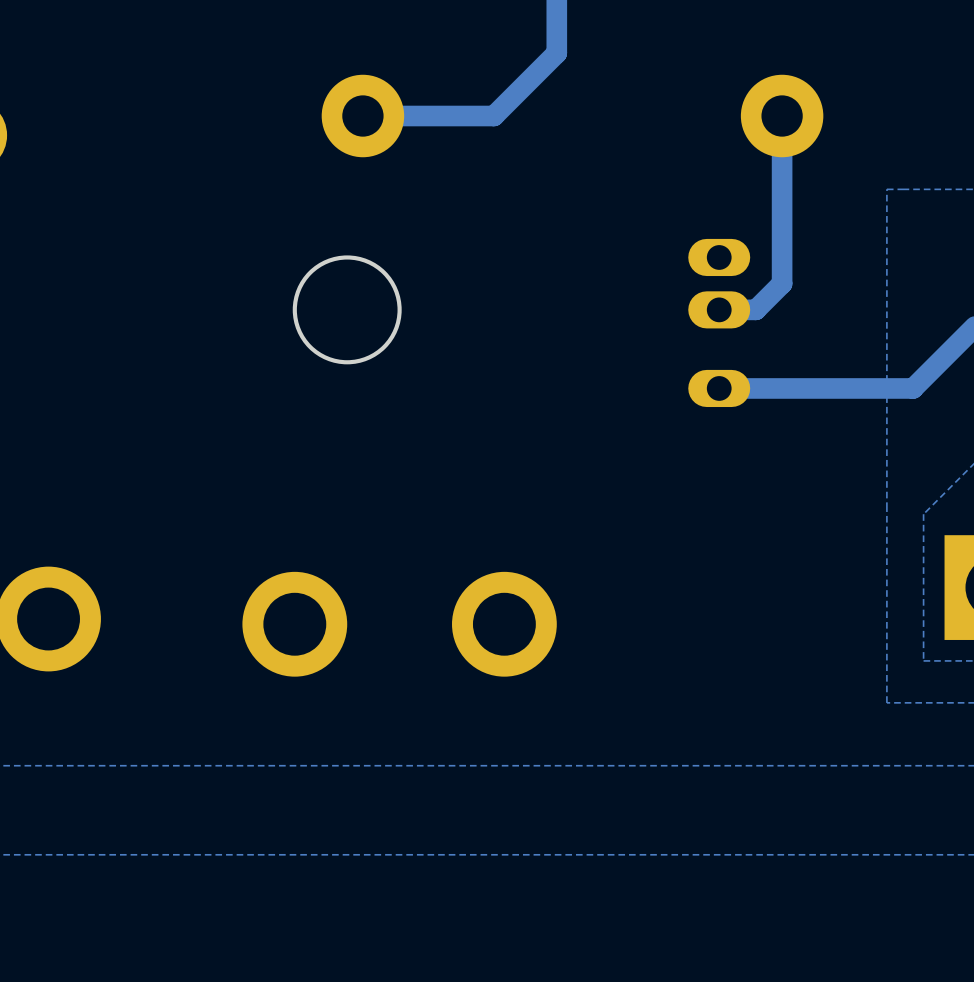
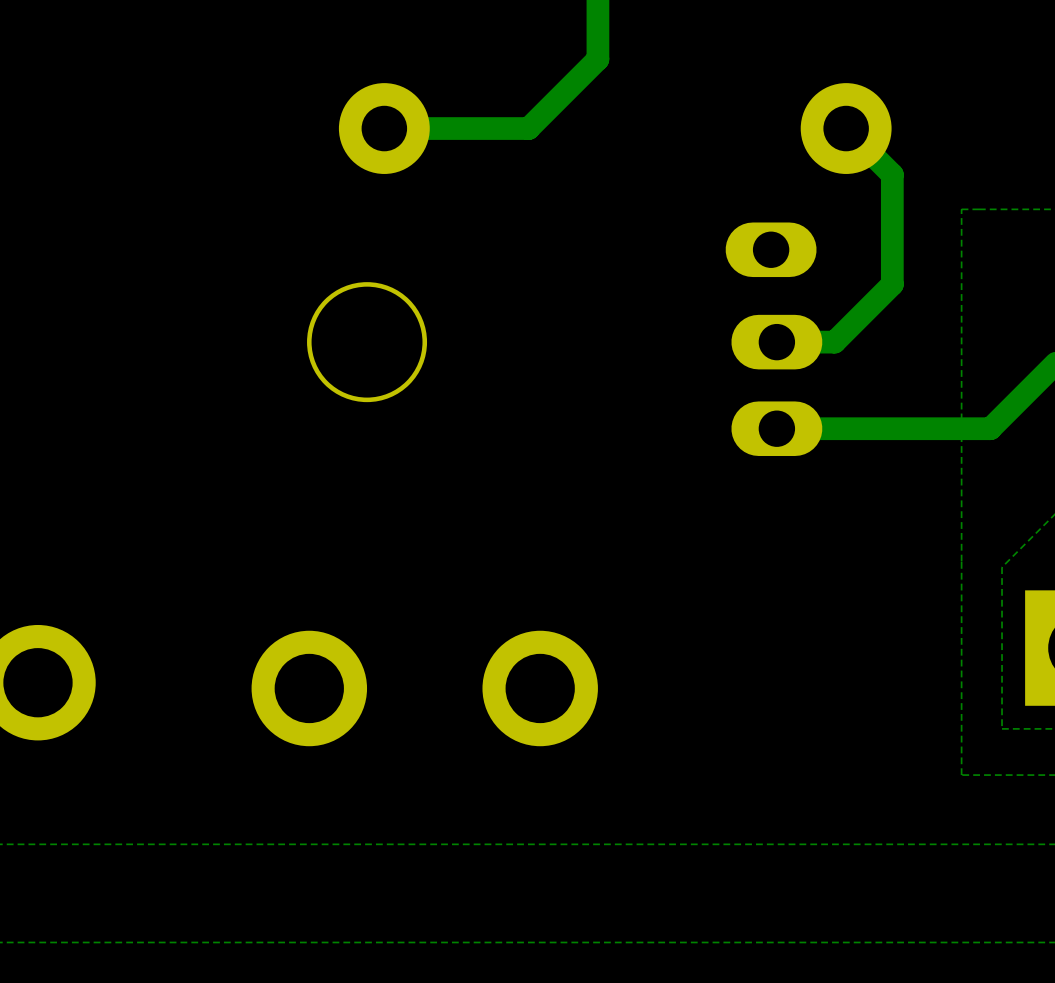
bottom track: (782, 116) (782, 283) (755, 309) -> (846, 128) (892, 174) (892, 284) (834, 342) (817, 342)
part footprint: [688, 238, 751, 408] -> [725, 222, 823, 456]

